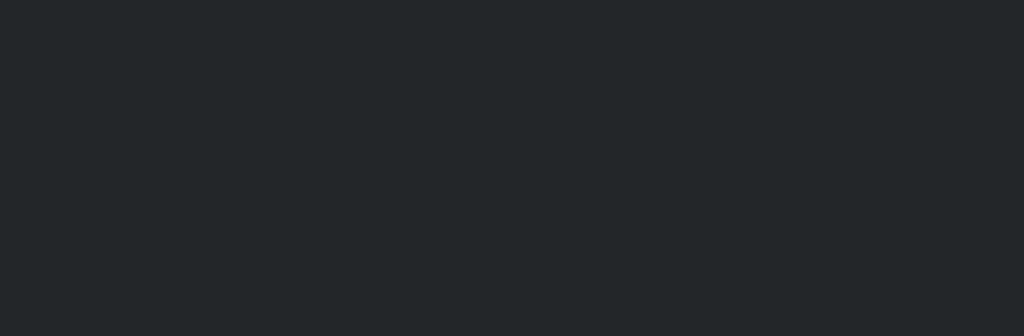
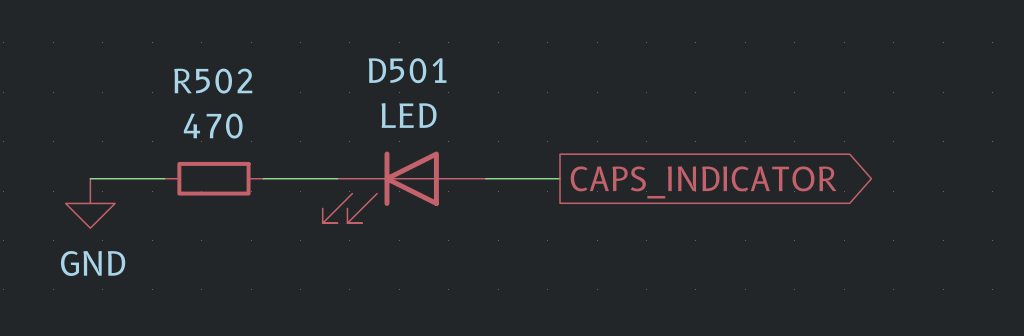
wire: none -> (90, 178) (164, 178)
R502: none -> 470 (213, 178)
wire: none -> (263, 178) (337, 178)
wire: none -> (485, 178) (560, 178)
global label: none -> CAPS_INDICATOR (703, 182)
D501: none -> LED (404, 187)
power symbol: none -> GND (90, 203)

